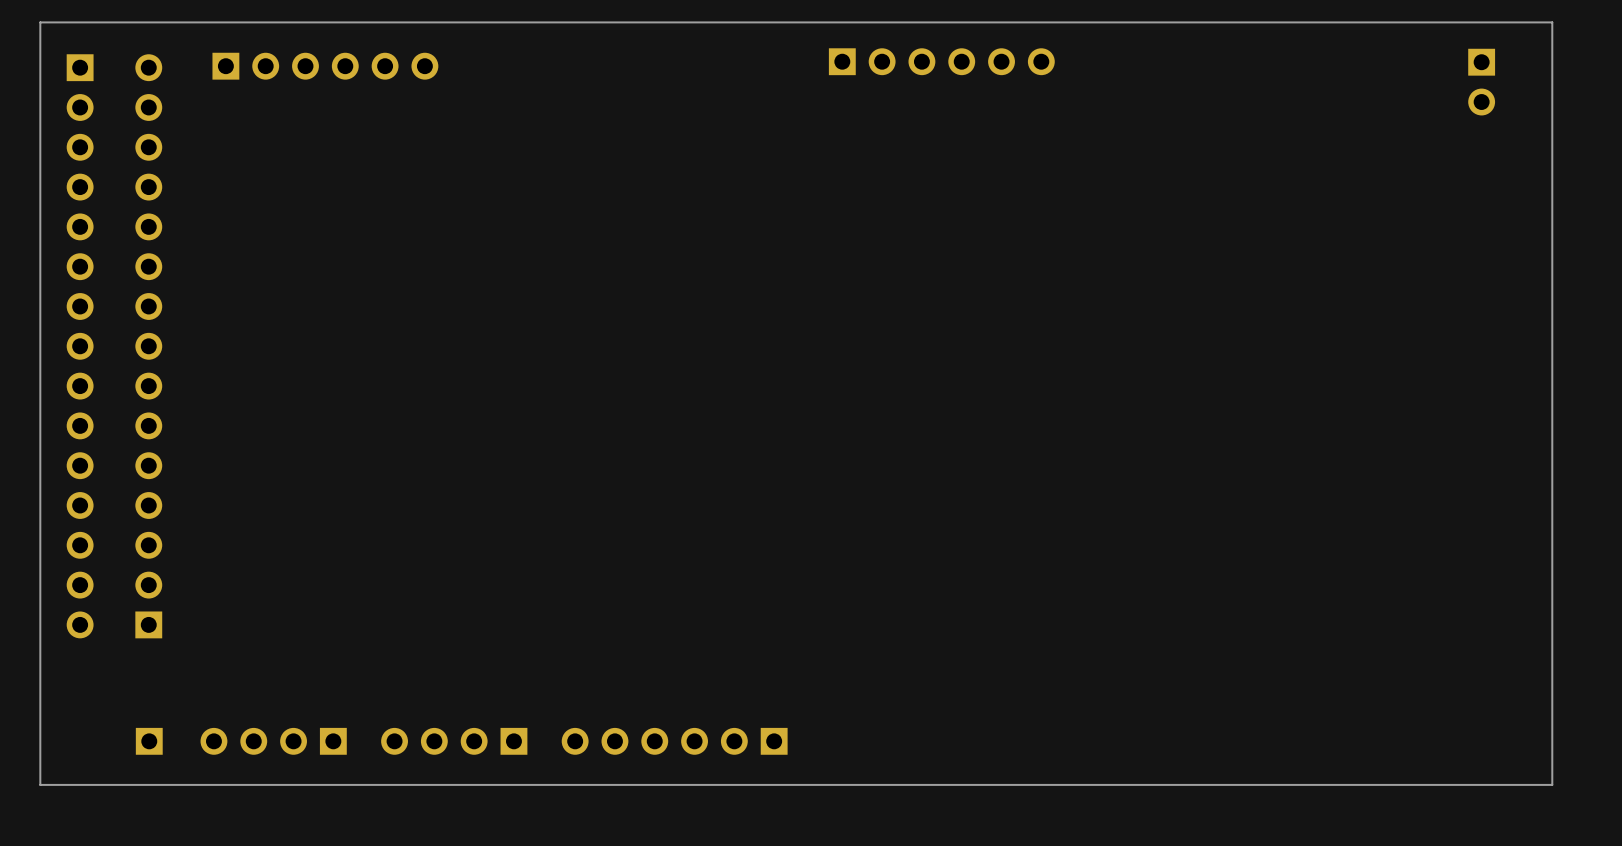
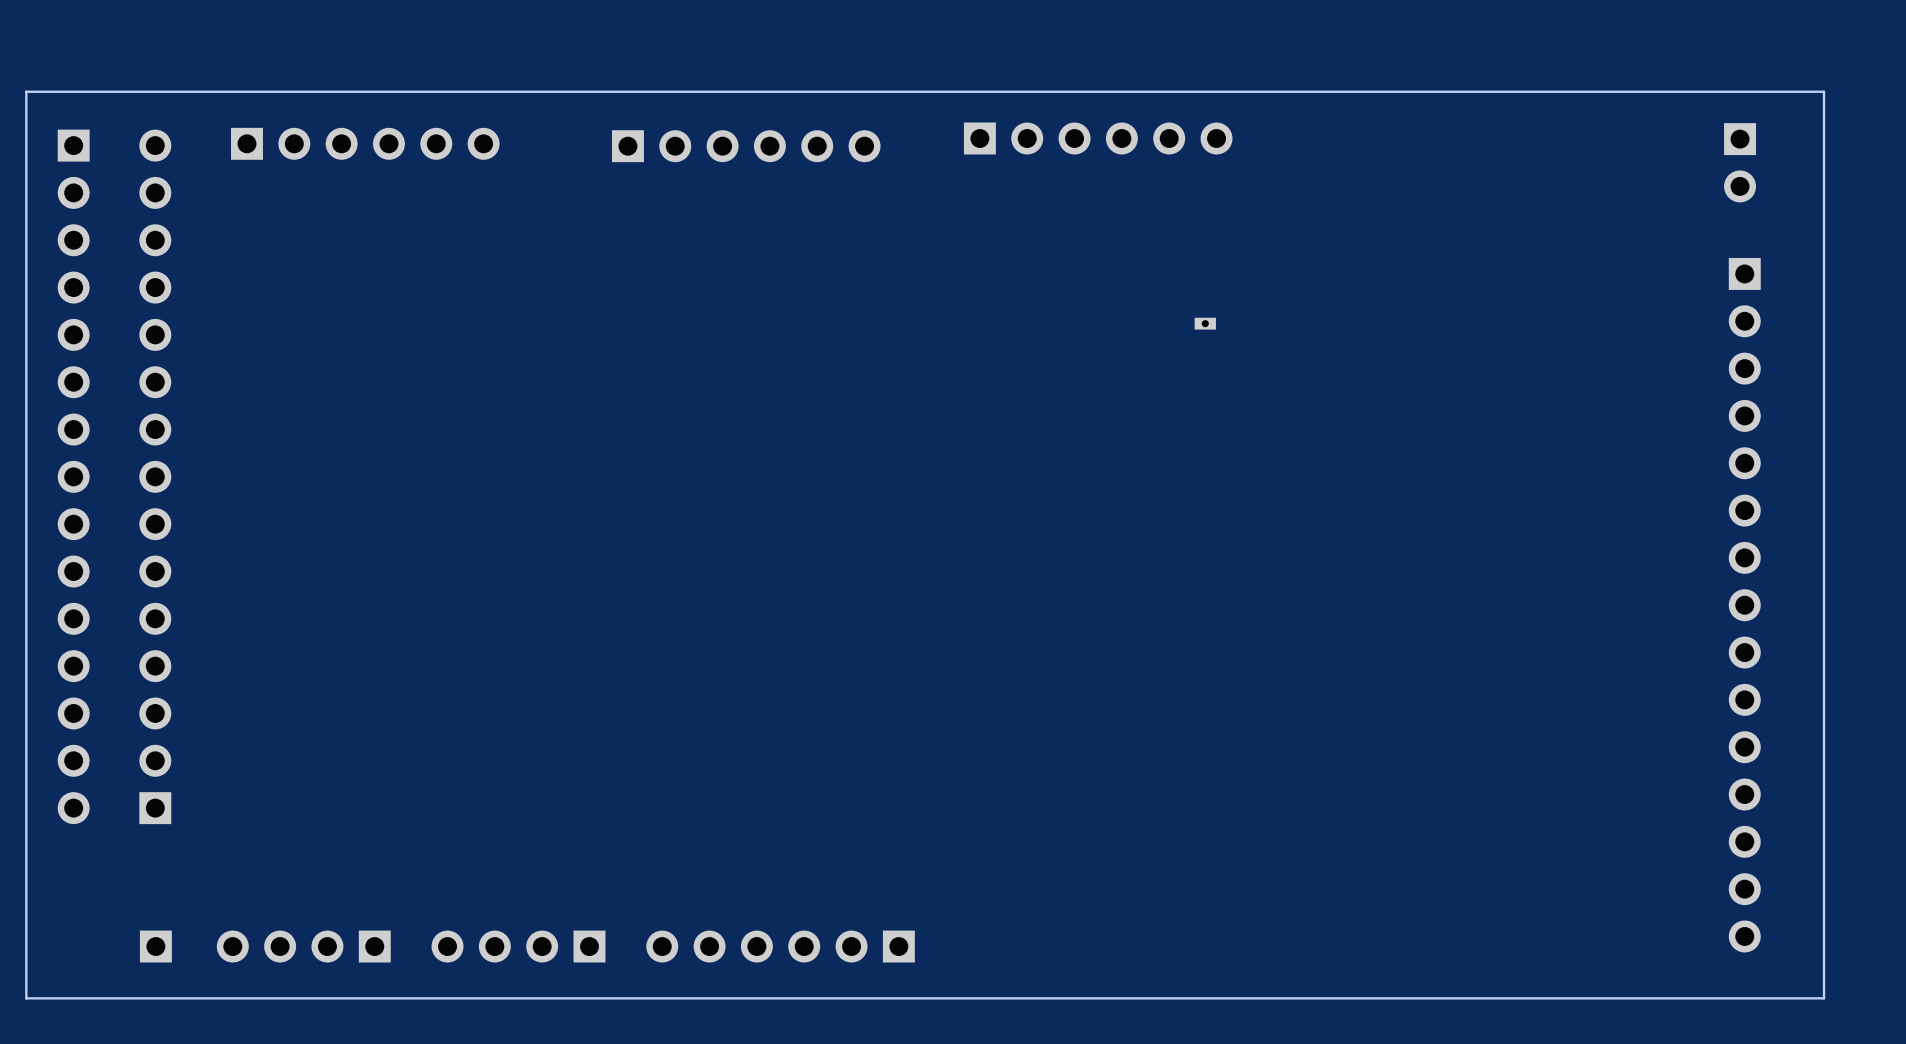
part: none -> (746, 146)
part: none -> (1205, 323)
part: none -> (1744, 605)

